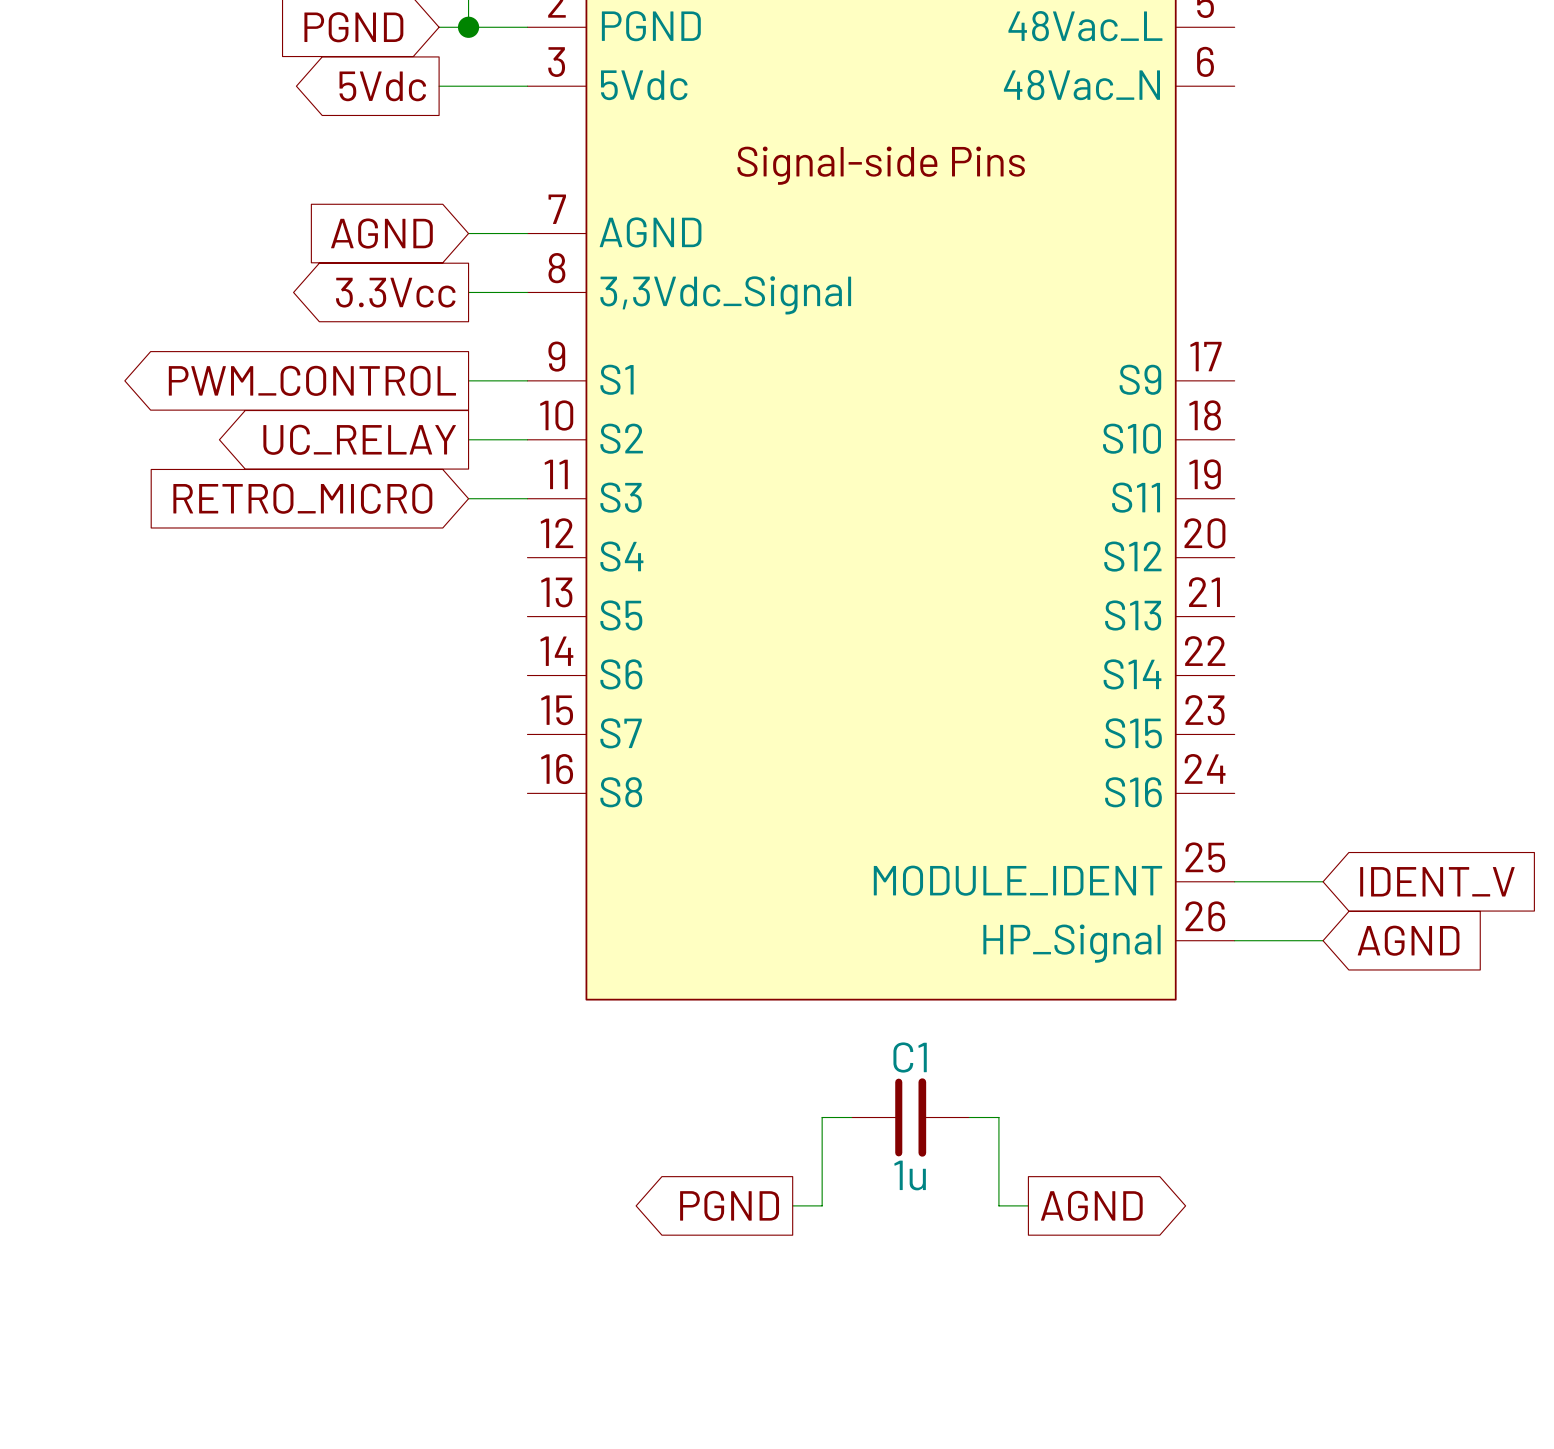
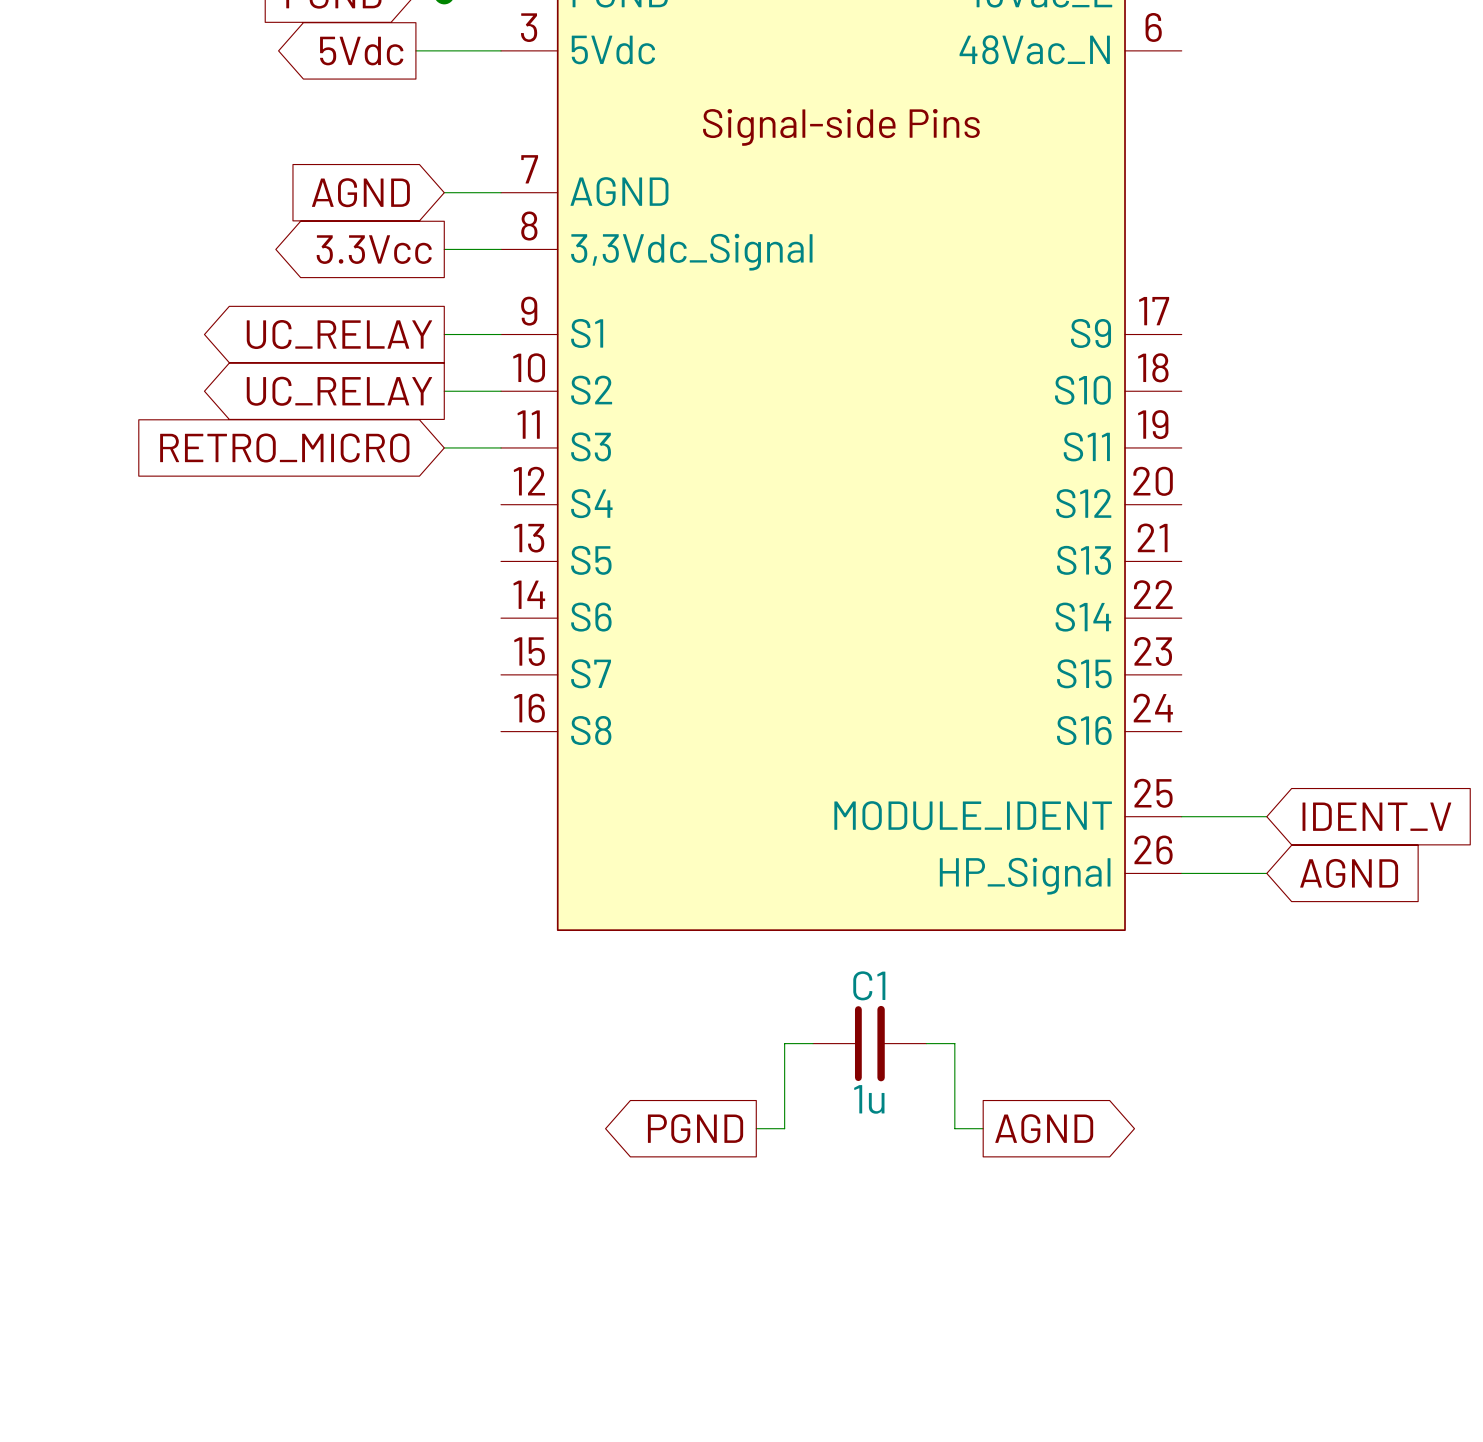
global label: PWM_CONTROL (312, 380) -> UC_RELAY (339, 334)

